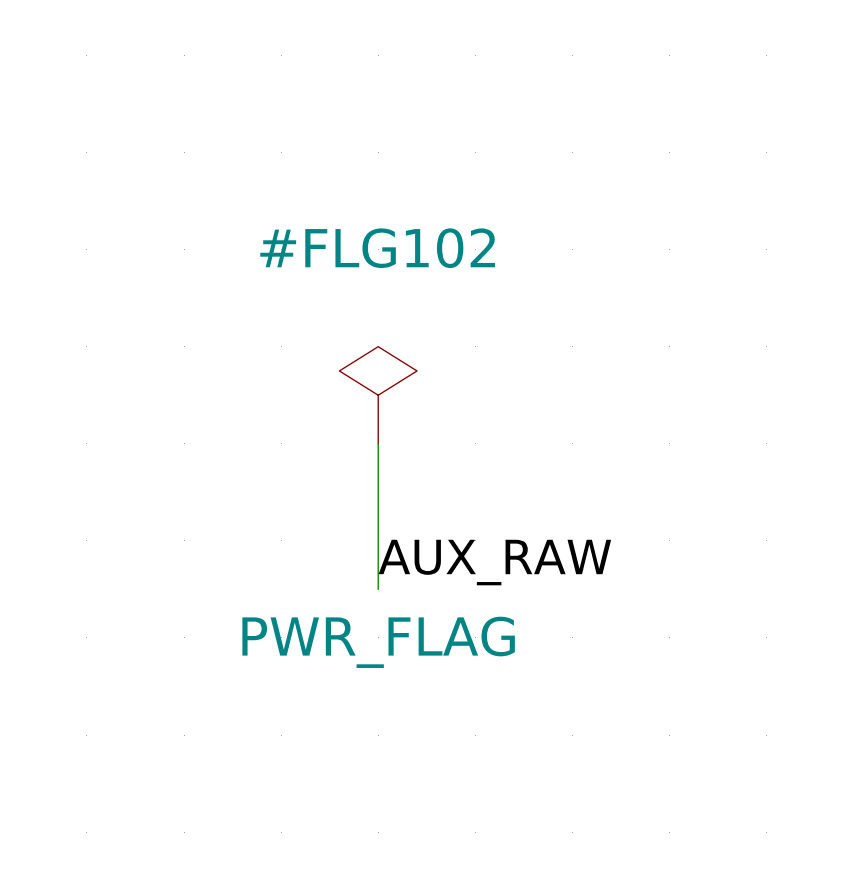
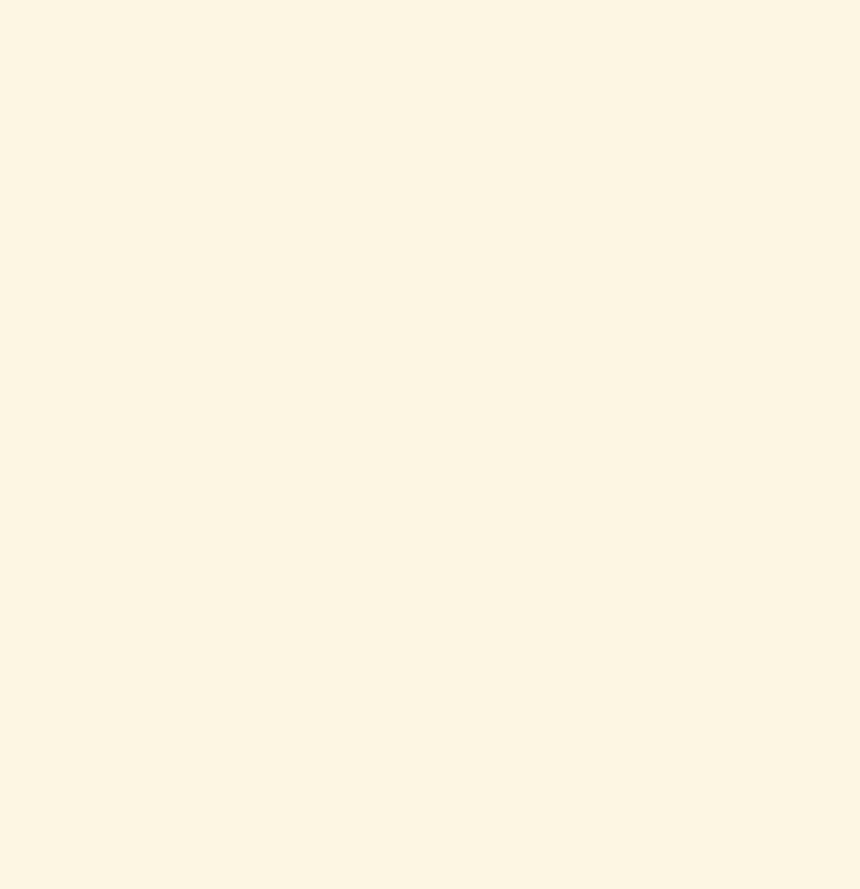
#FLG102: PWR_FLAG (378, 395) -> none
wire: (378, 443) (378, 589) -> none
label: AUX_RAW (494, 562) -> none

